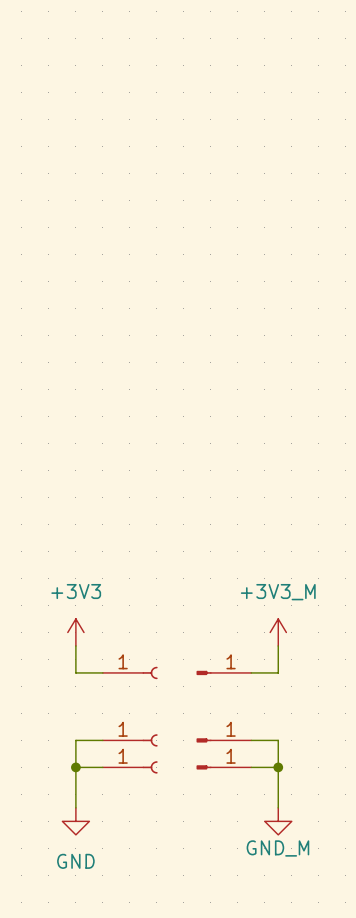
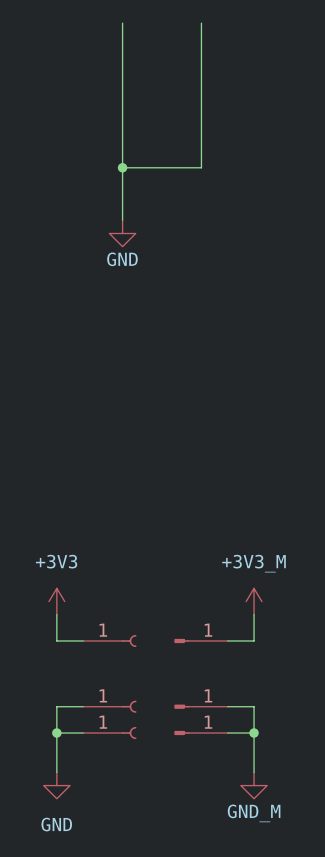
wire: none -> (122, 23) (122, 220)
wire: none -> (201, 23) (201, 167) (122, 167)
junction: none -> (122, 167)
power symbol: none -> GND (122, 233)

